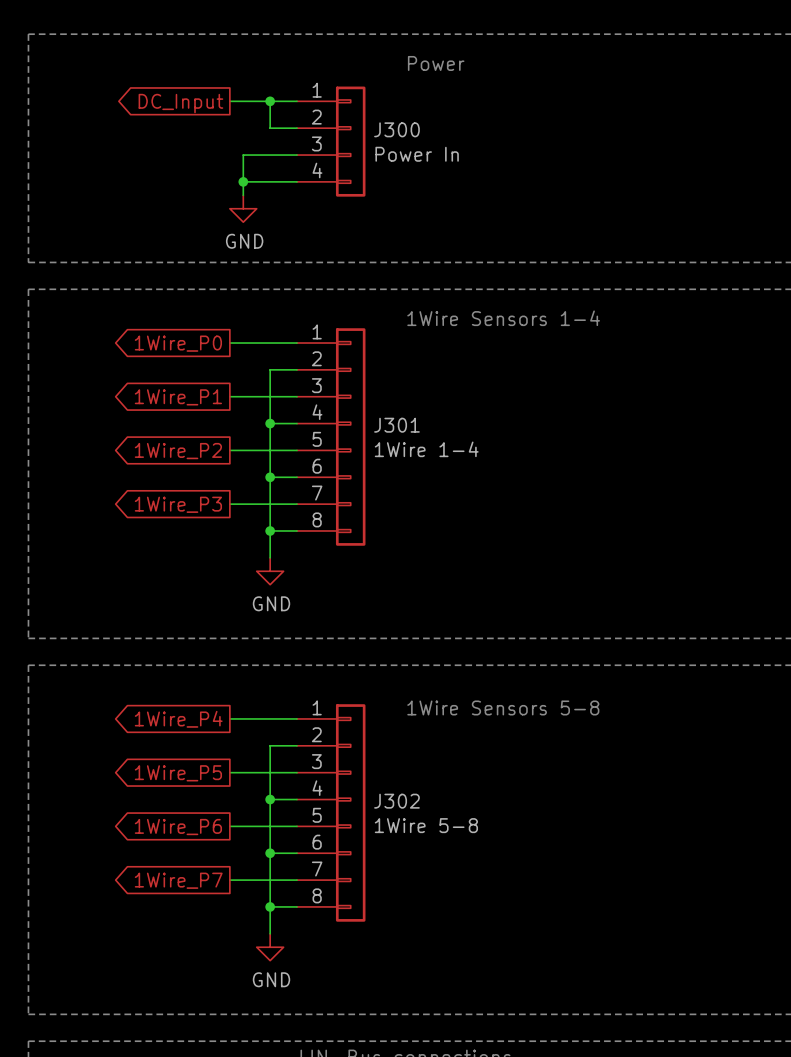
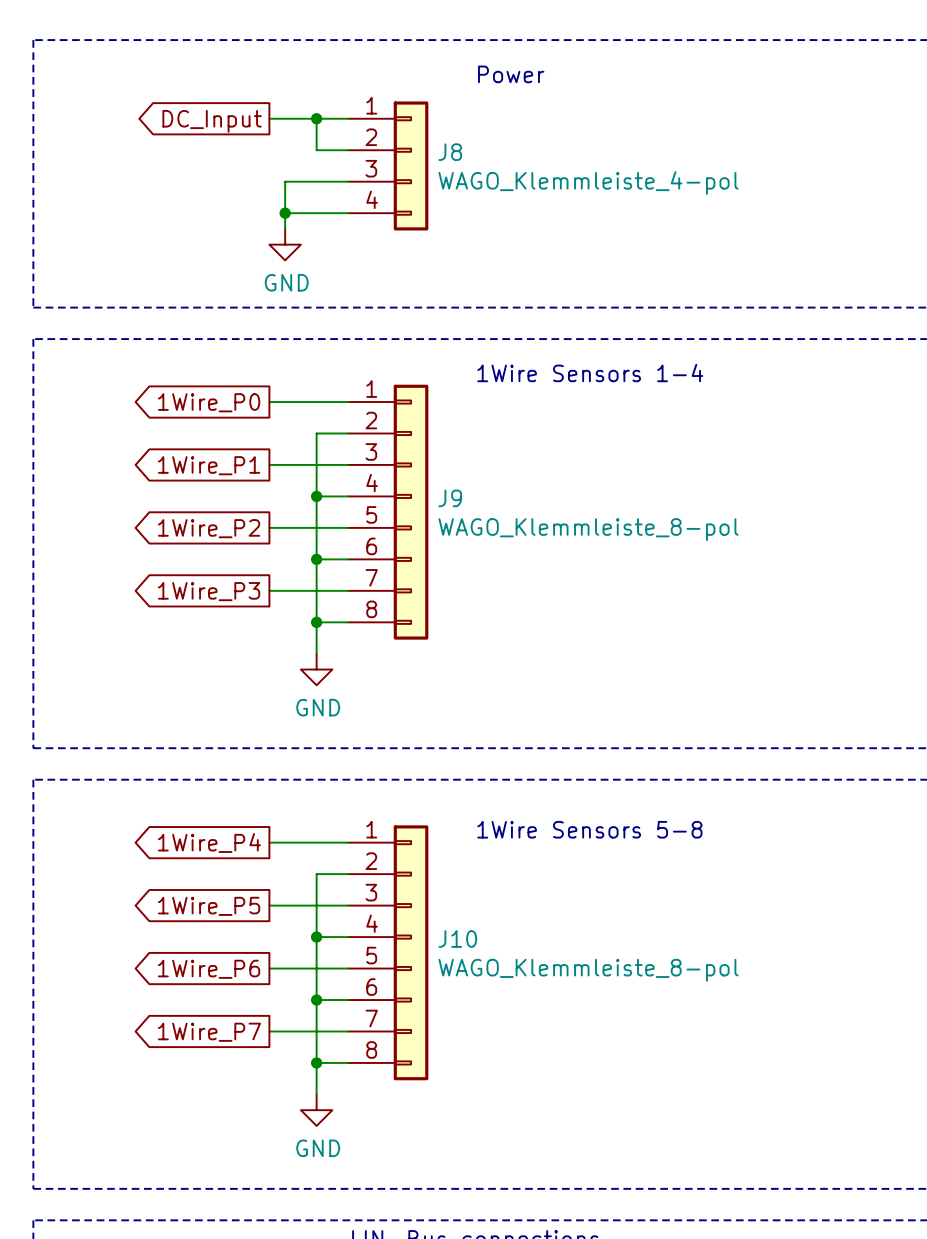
J300 name: J300 (396, 129) -> J8 (450, 152)
J300 value: Power In (417, 154) -> WAGO_Klemmleiste_4-pol (588, 183)
J301 name: J301 (396, 425) -> J9 (450, 498)
J301 value: 1Wire 1-4 (426, 449) -> WAGO_Klemmleiste_8-pol (588, 529)
J302 name: J302 (396, 801) -> J10 (457, 939)
J302 value: 1Wire 5-8 (426, 825) -> WAGO_Klemmleiste_8-pol (588, 970)

